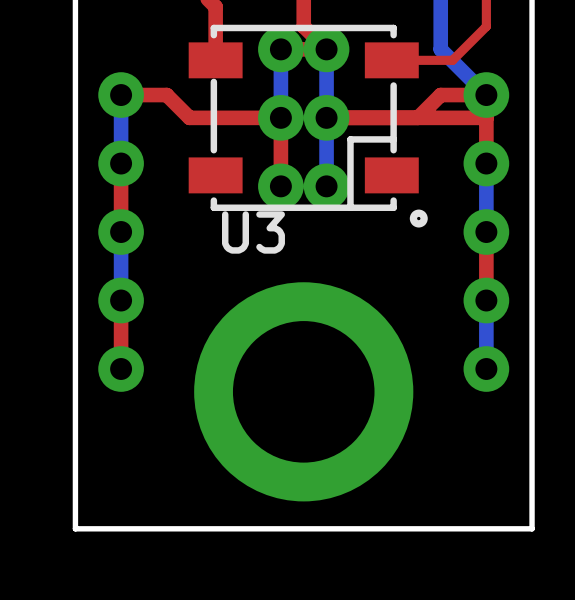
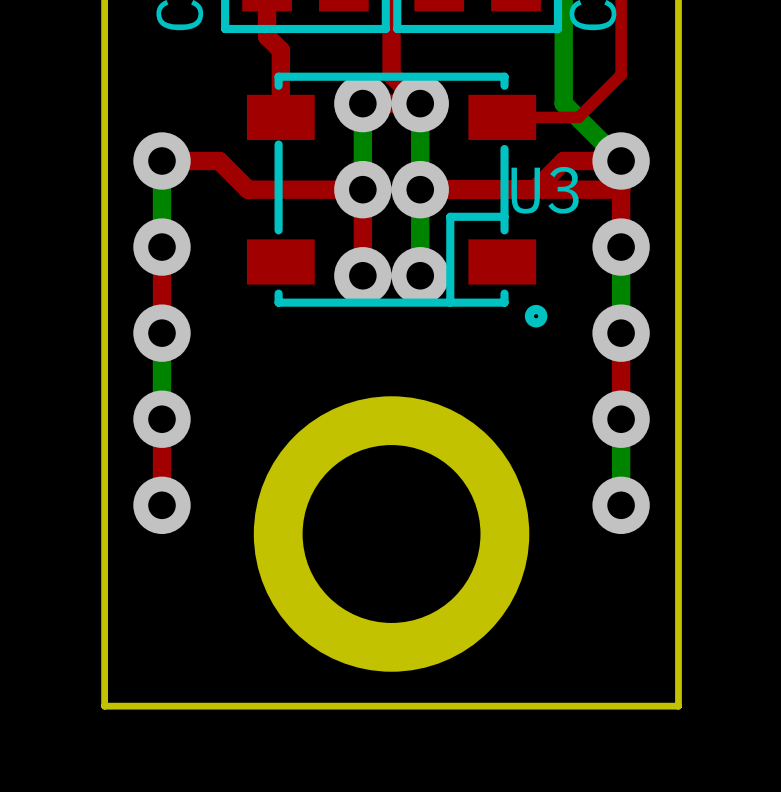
U3 name position: U3 (253, 232) -> U3 (545, 190)

